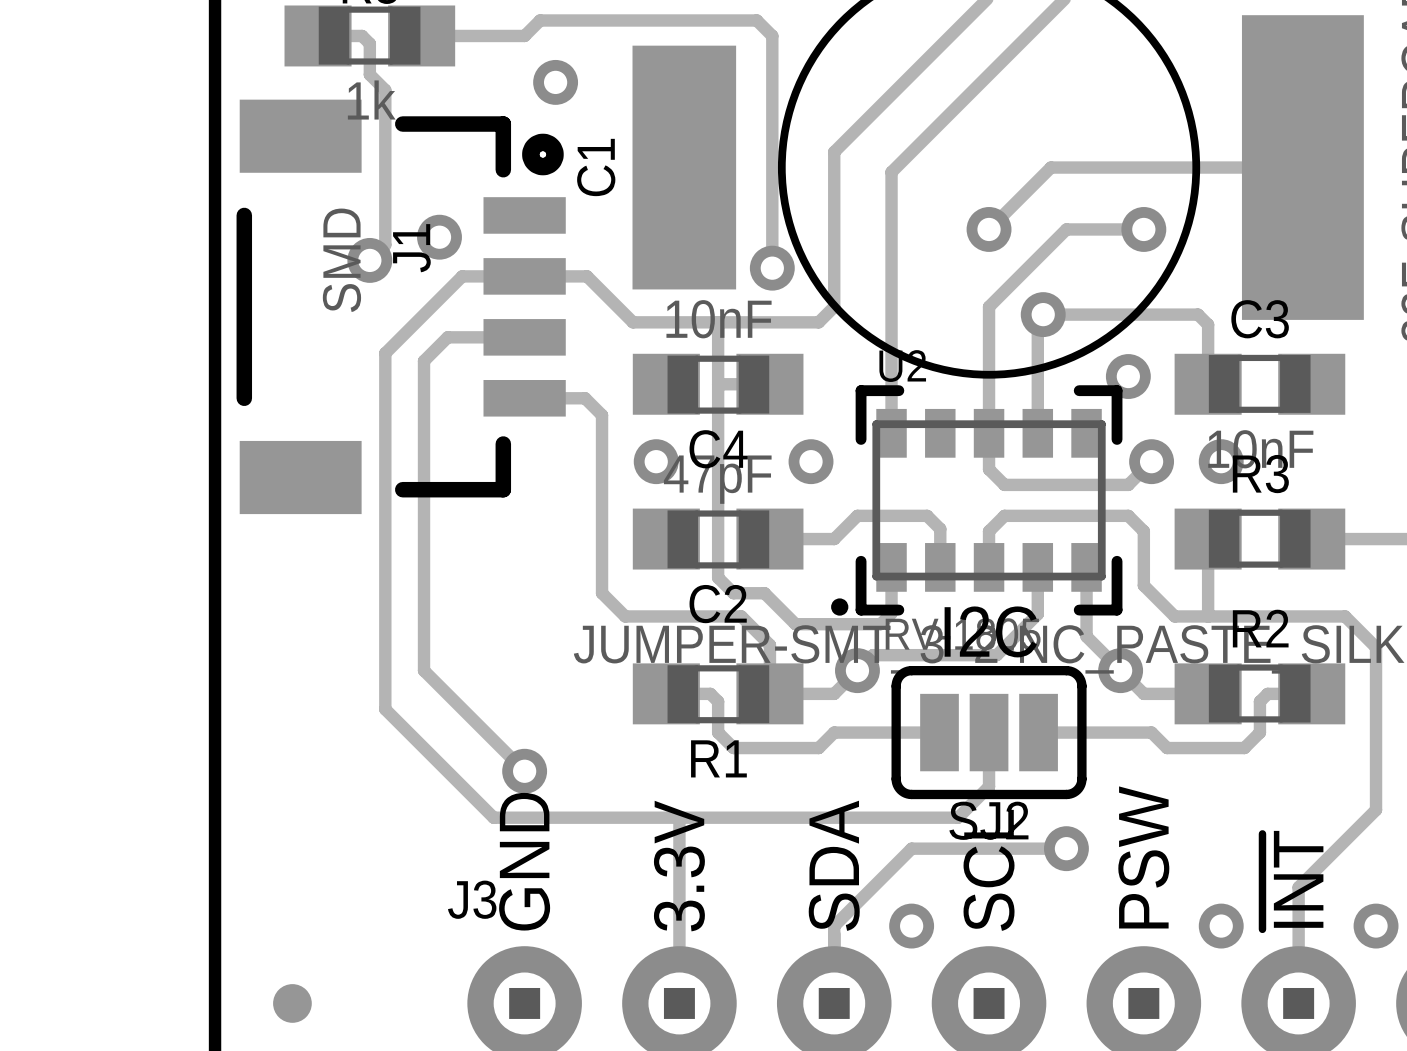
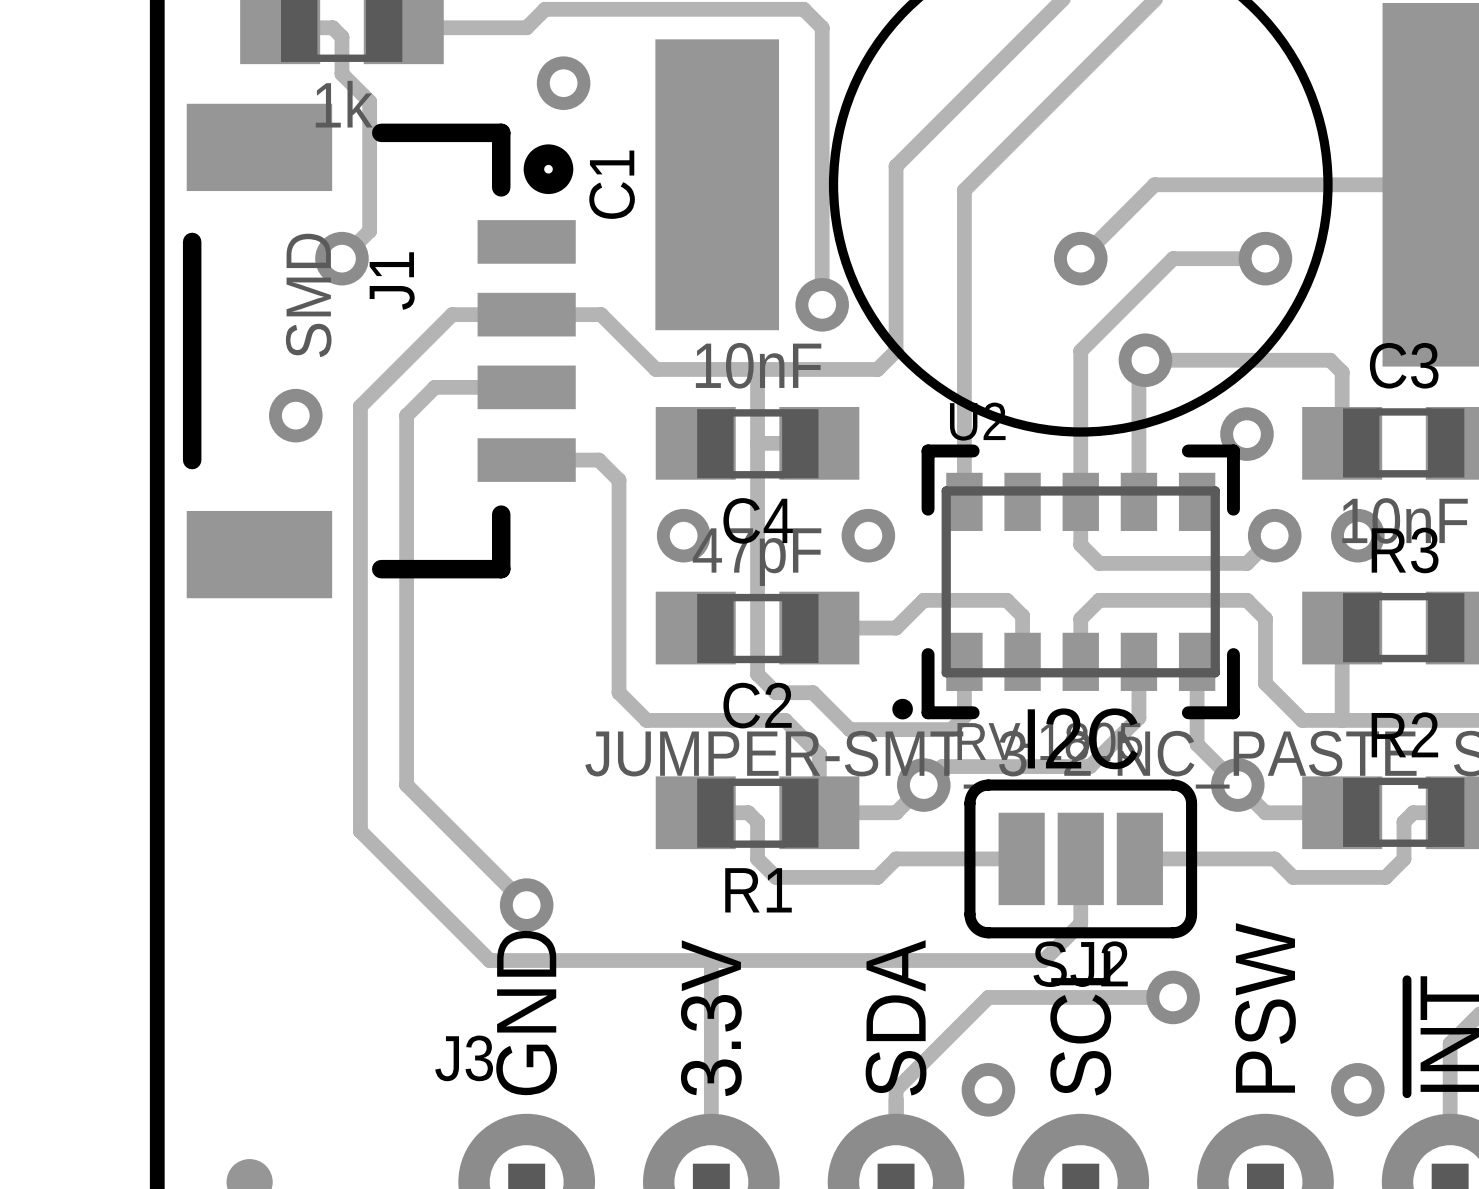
track: (385, 90) (385, 244) (369, 260) -> (360, 92) (369, 101) (369, 230) (341, 258)
via: (439, 237) -> none
via position: (369, 260) -> (341, 258)
via: none -> (295, 415)

